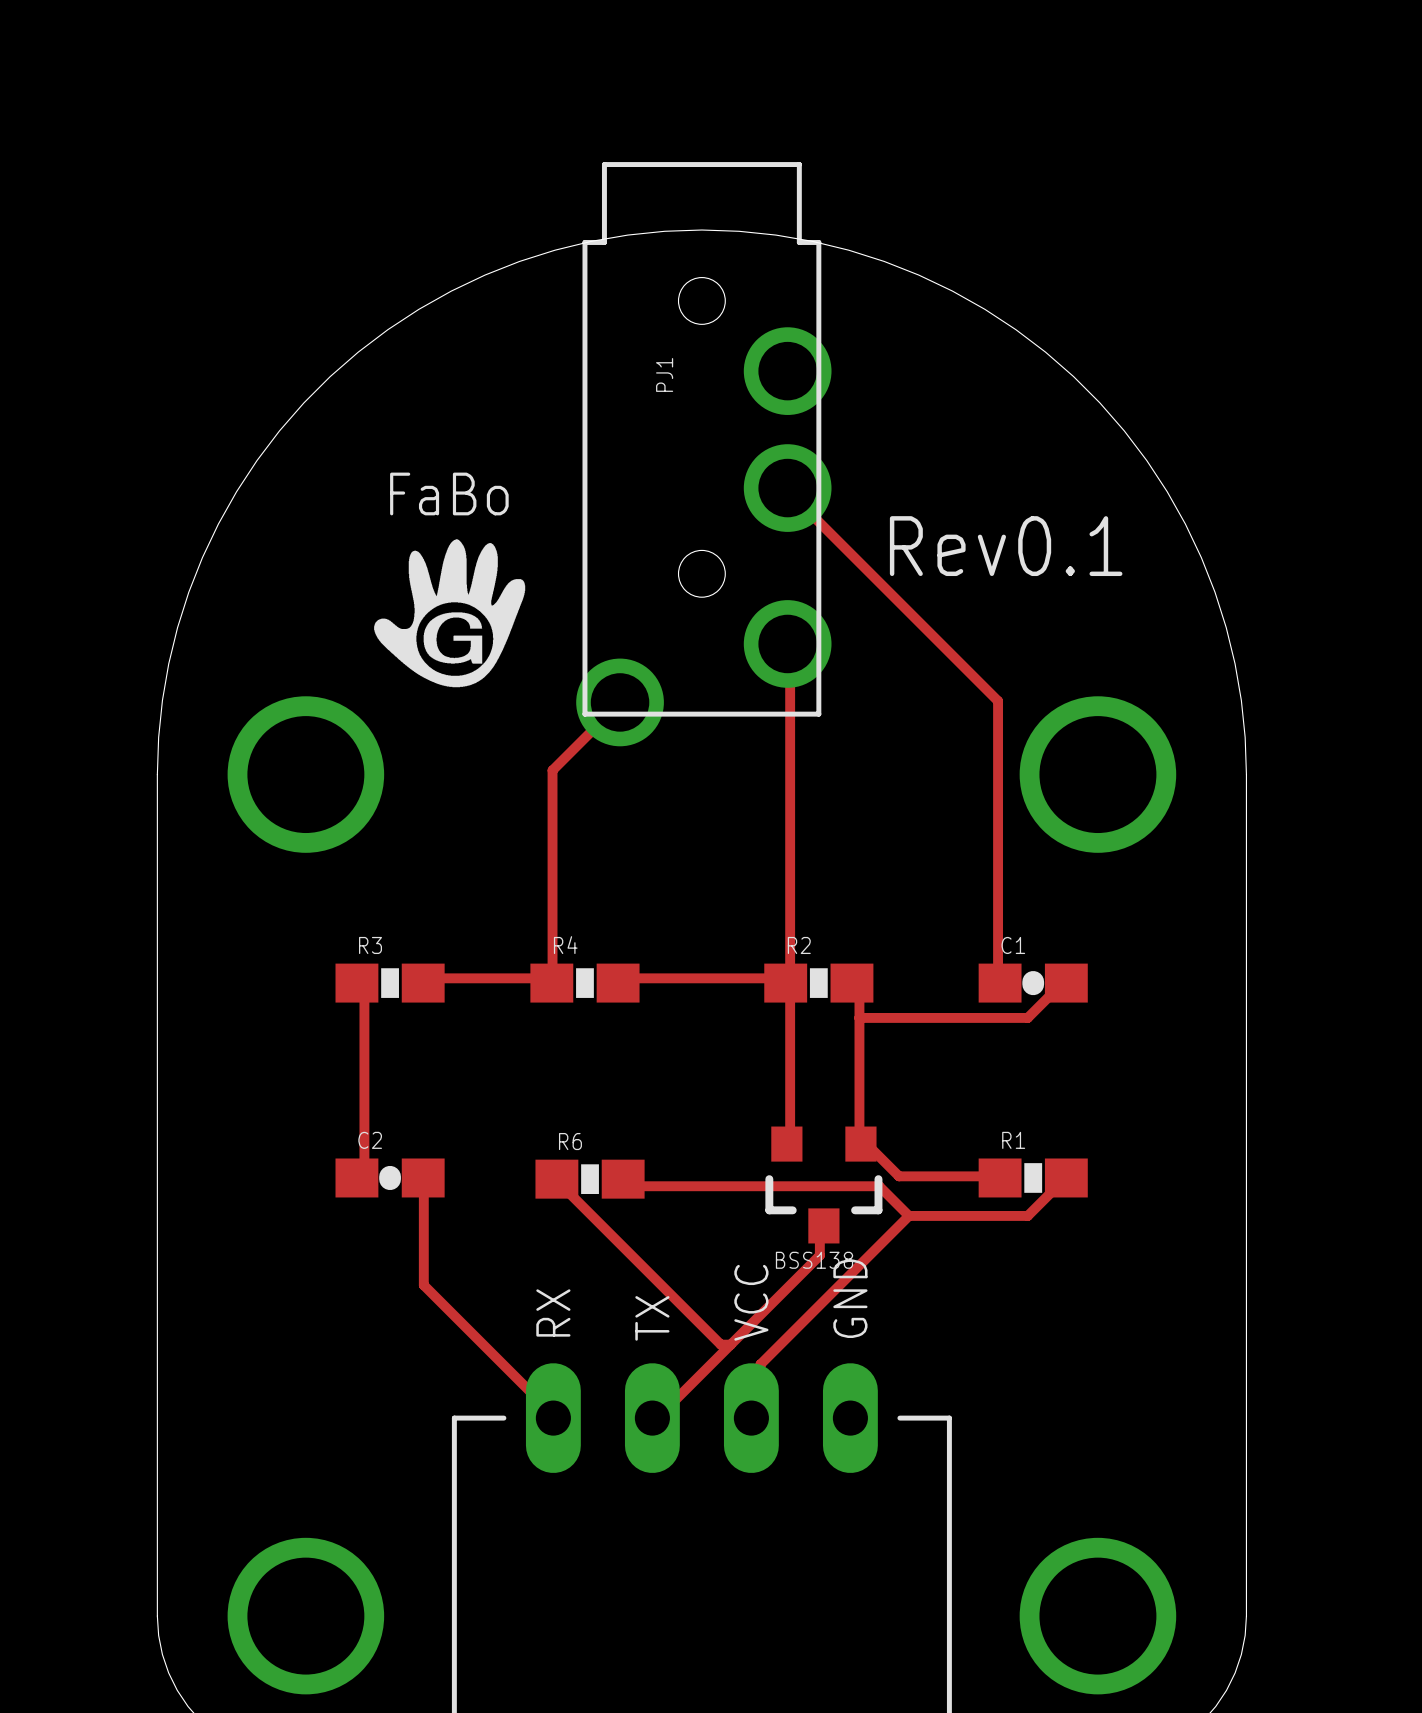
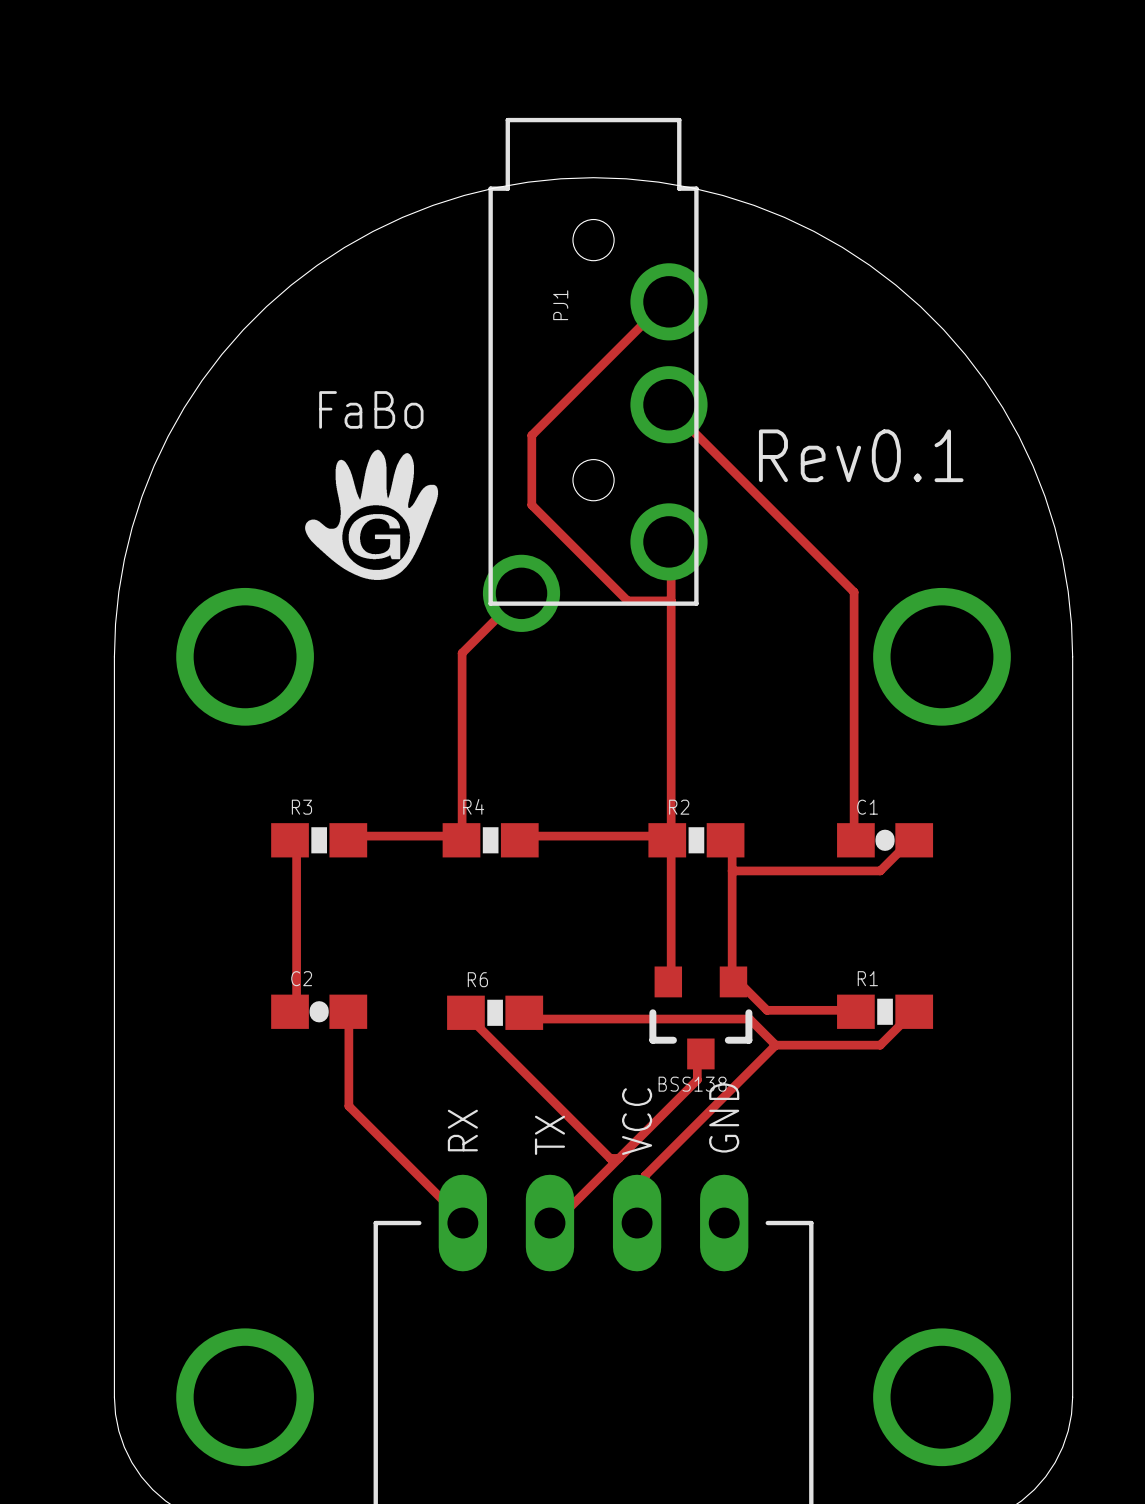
track: none -> (668, 301) (662, 304) (531, 435) (531, 505) (627, 600) (671, 600)

